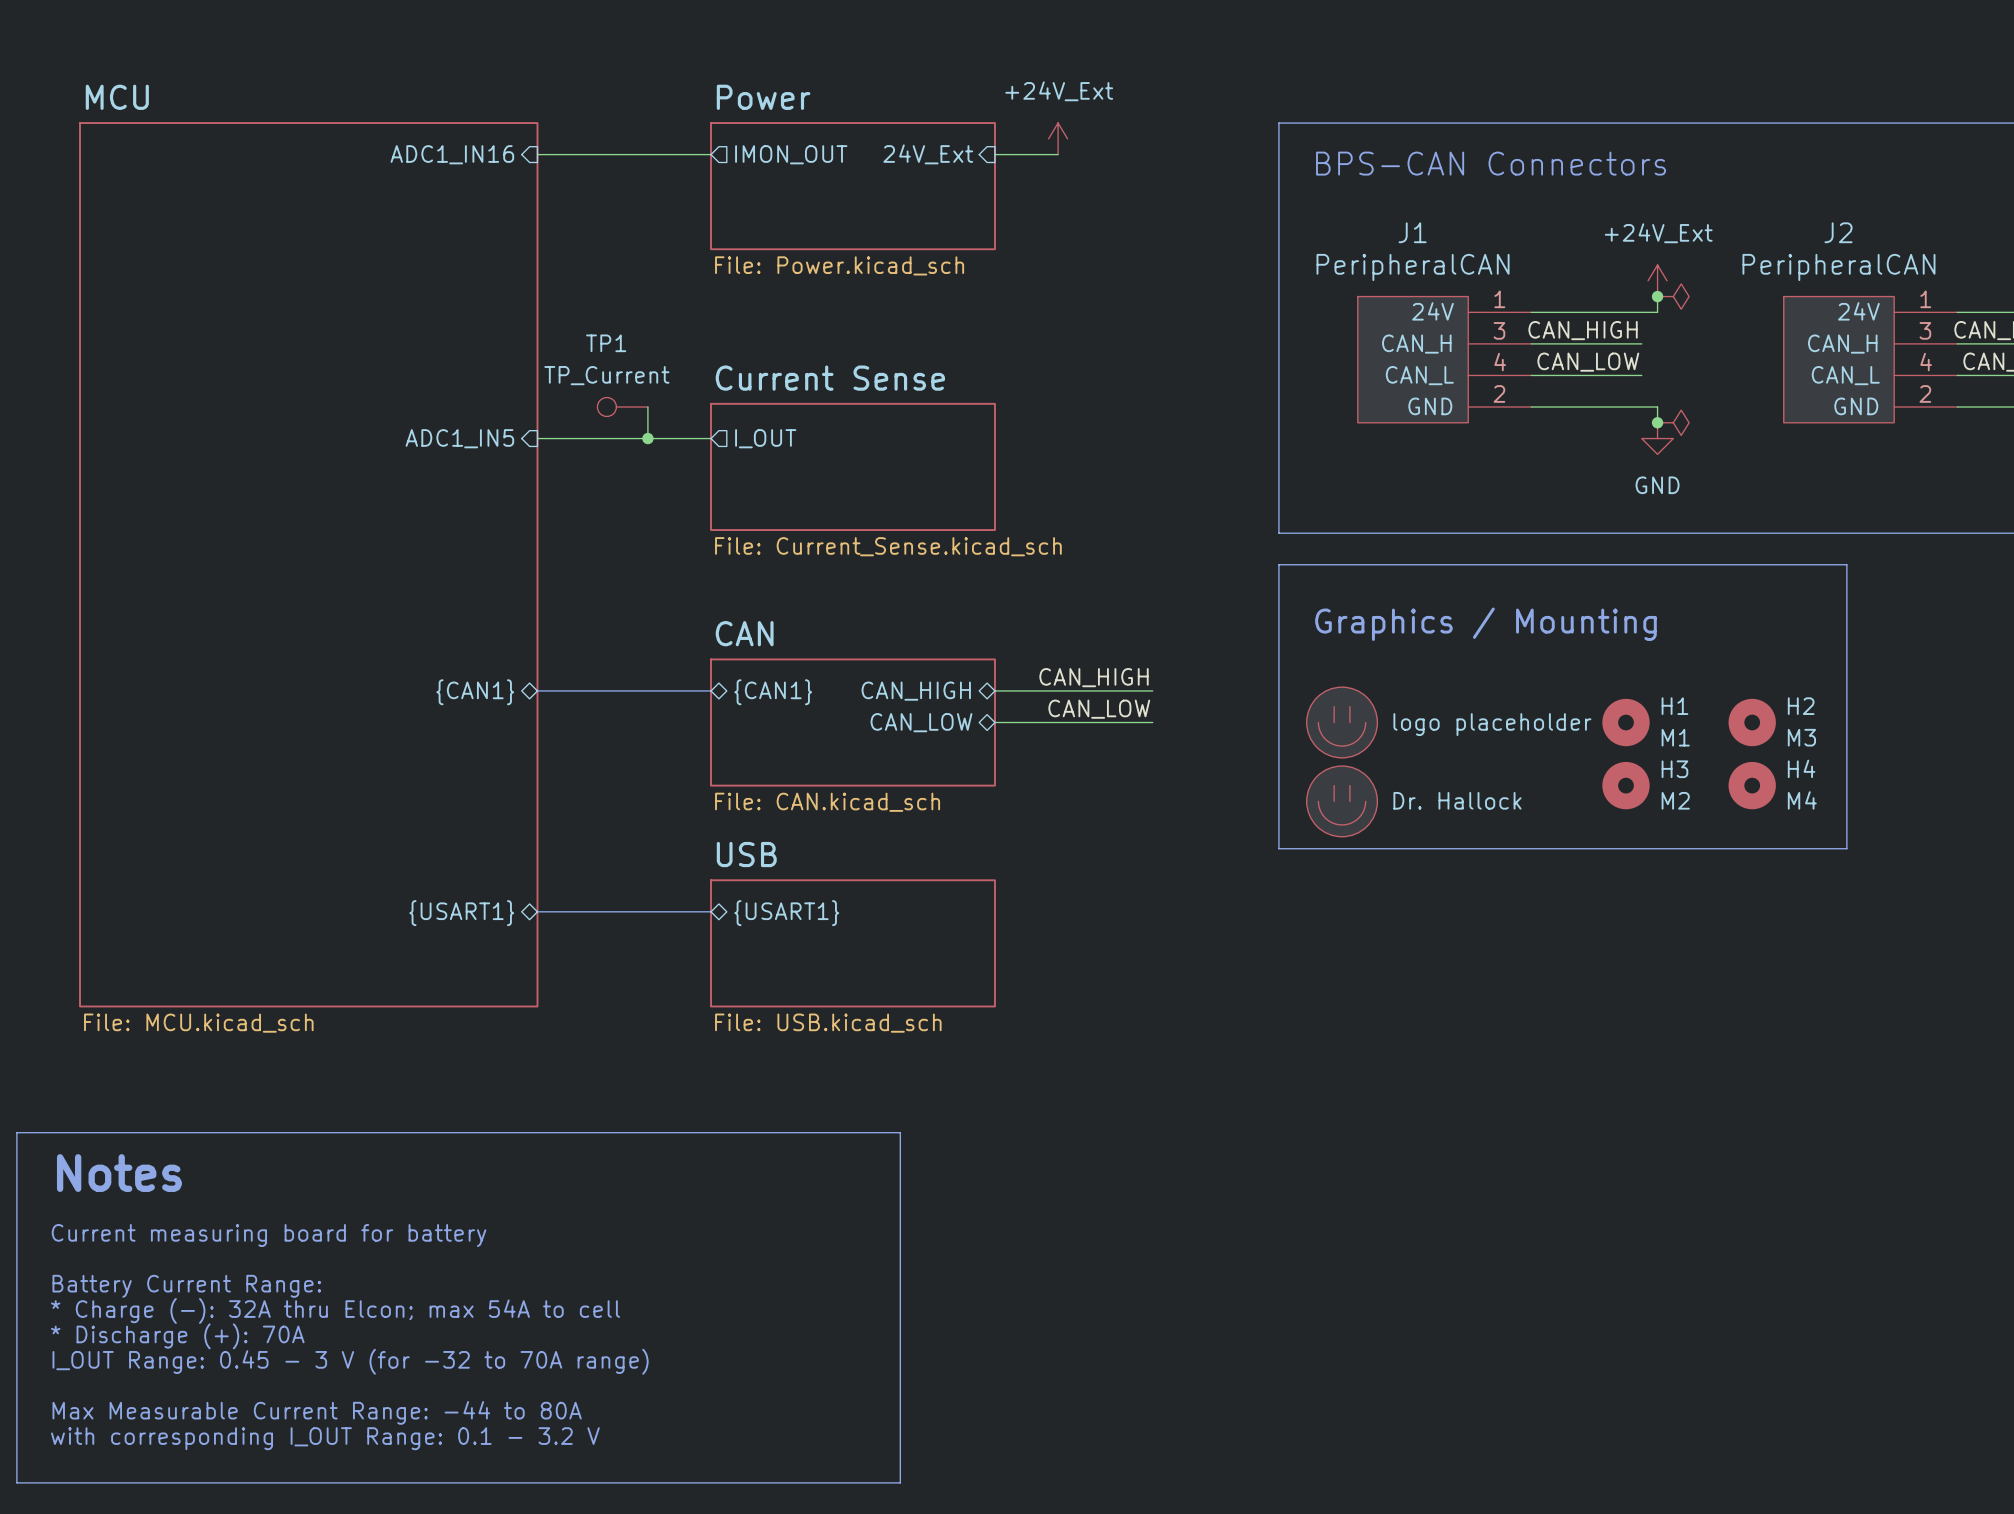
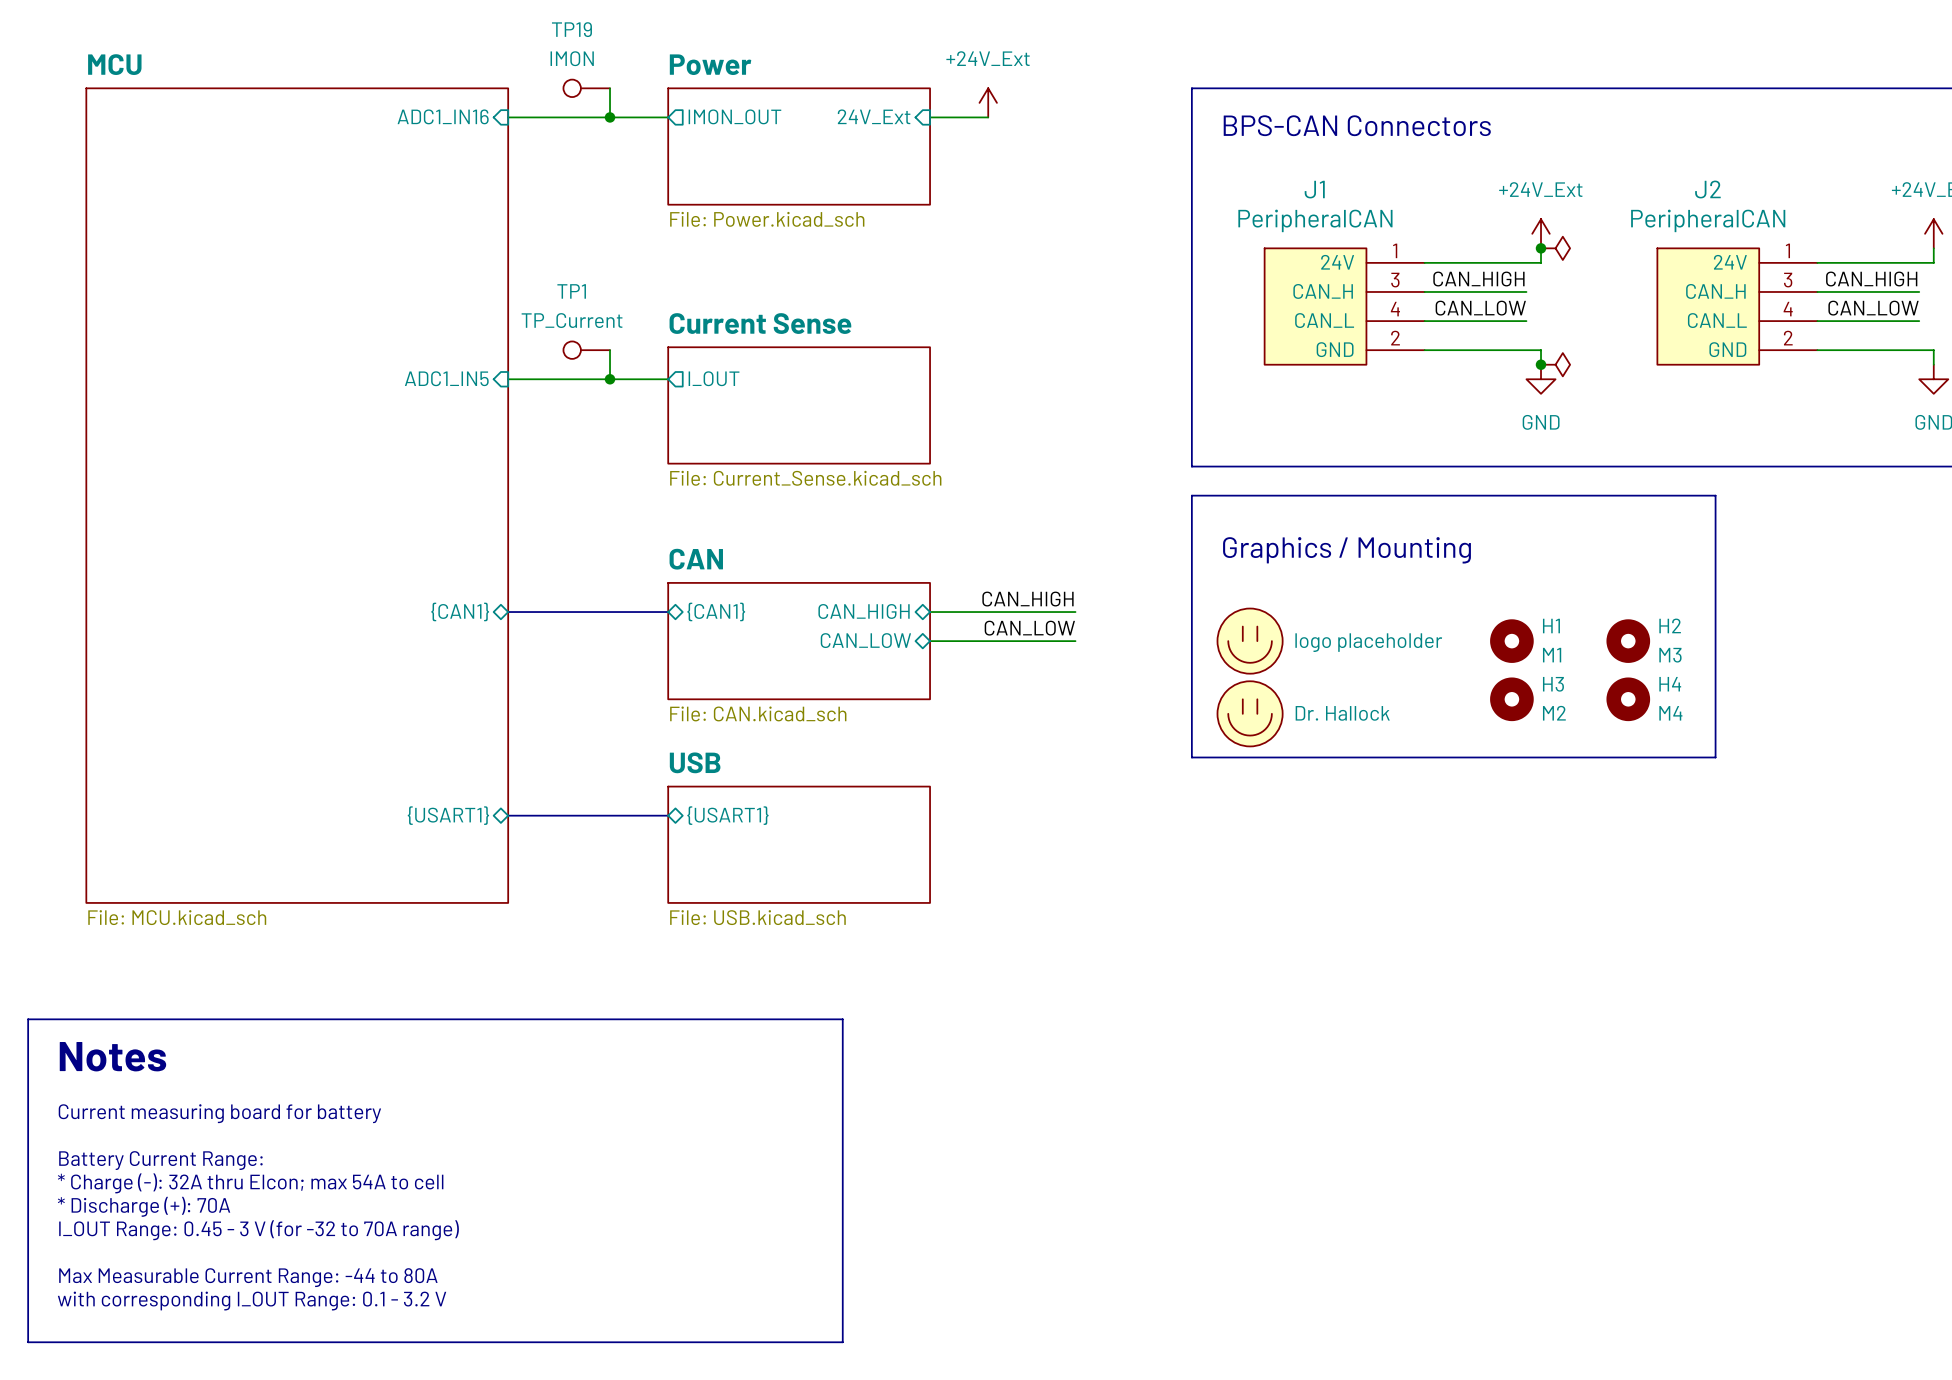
TP19: none -> IMON (586, 88)
wire: none -> (610, 88) (610, 117)
junction: none -> (610, 117)

